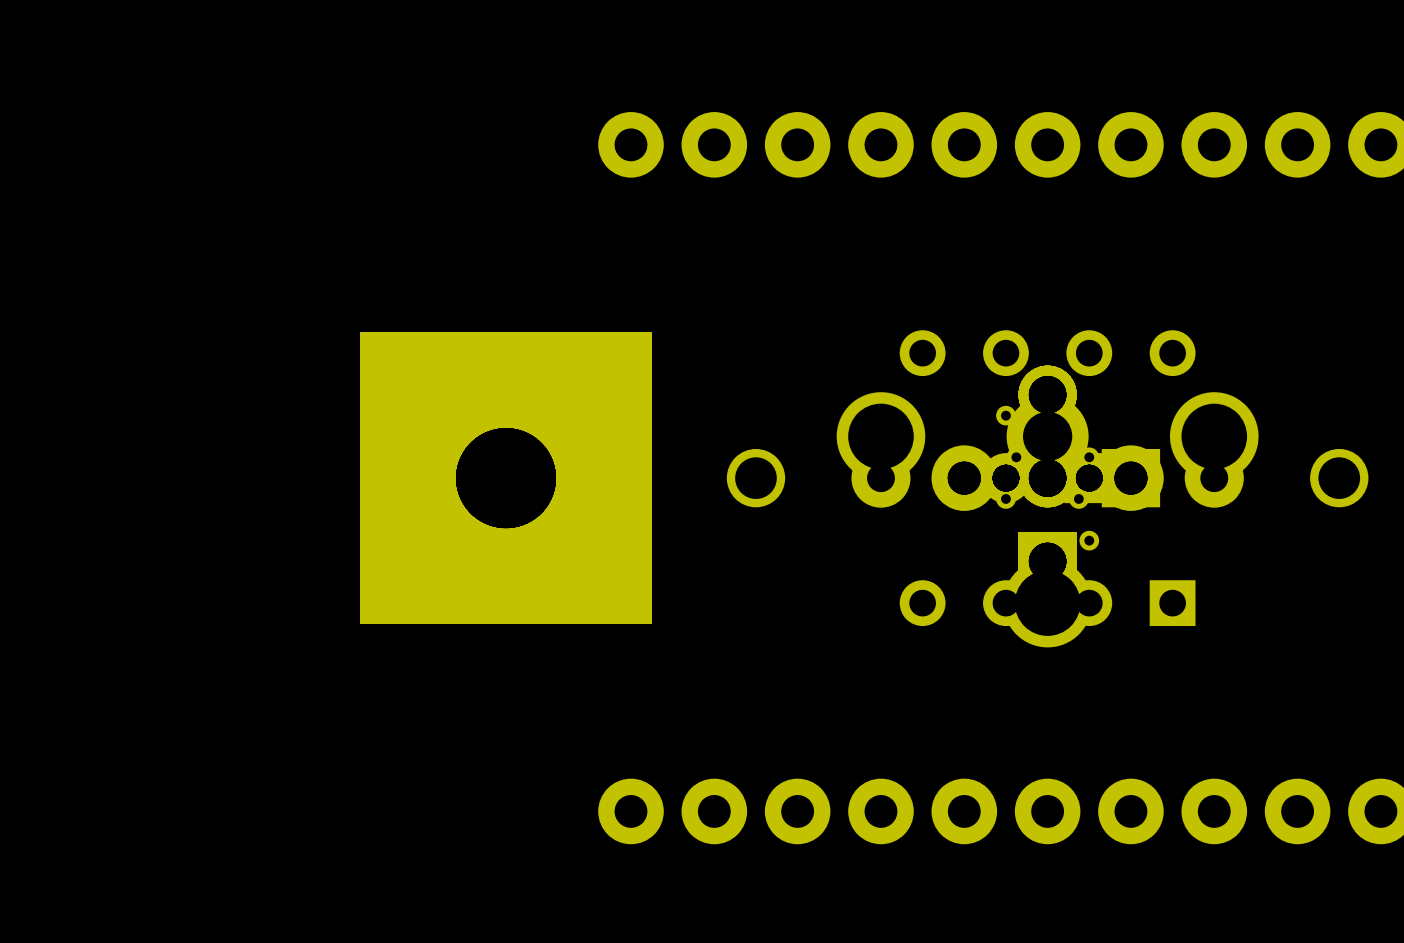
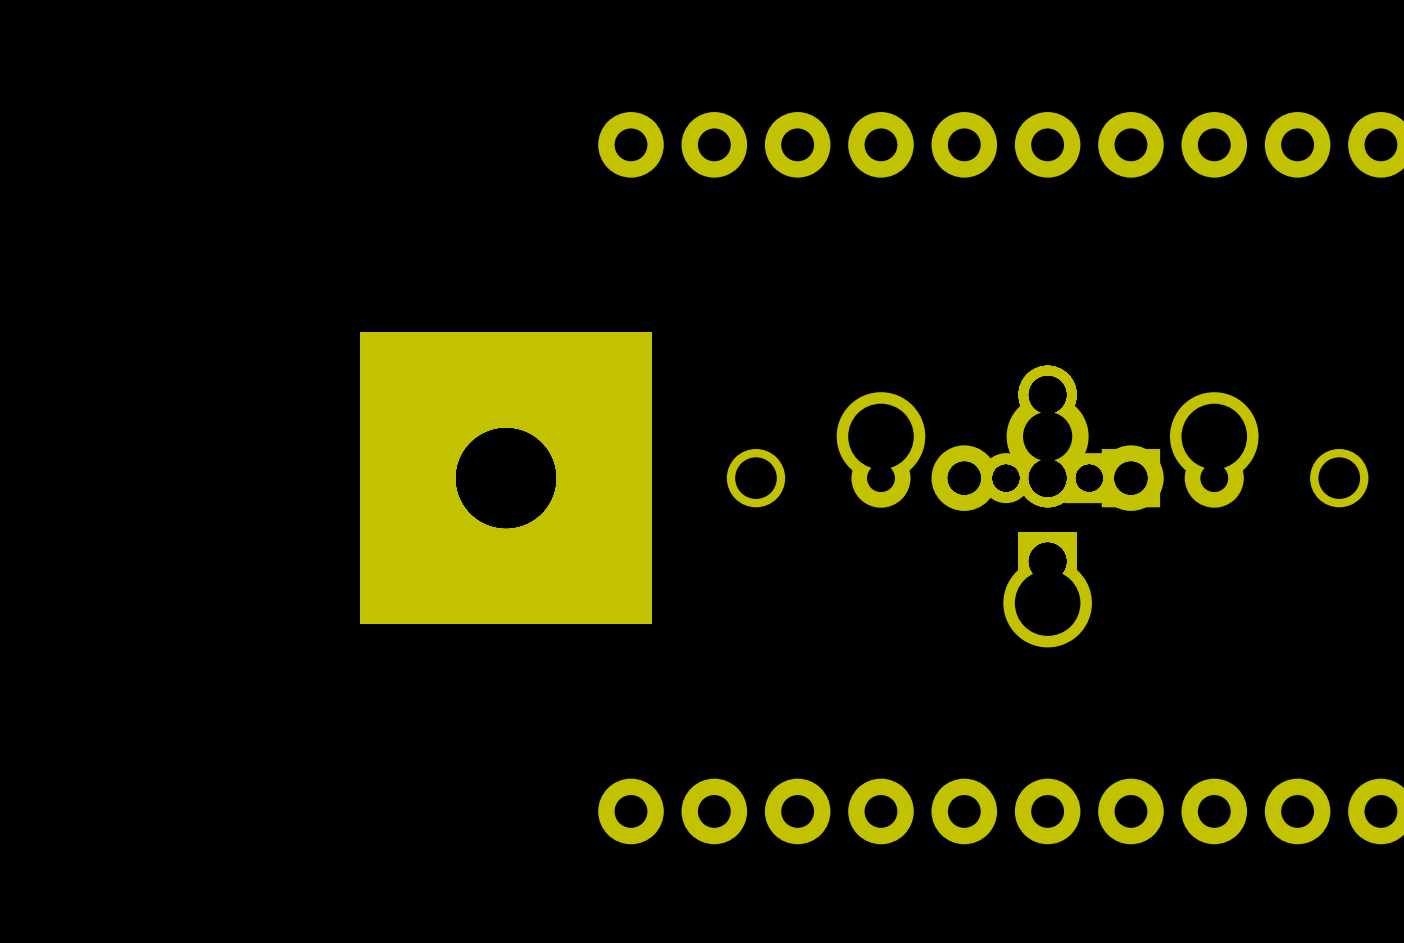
part: (1047, 478) -> none

